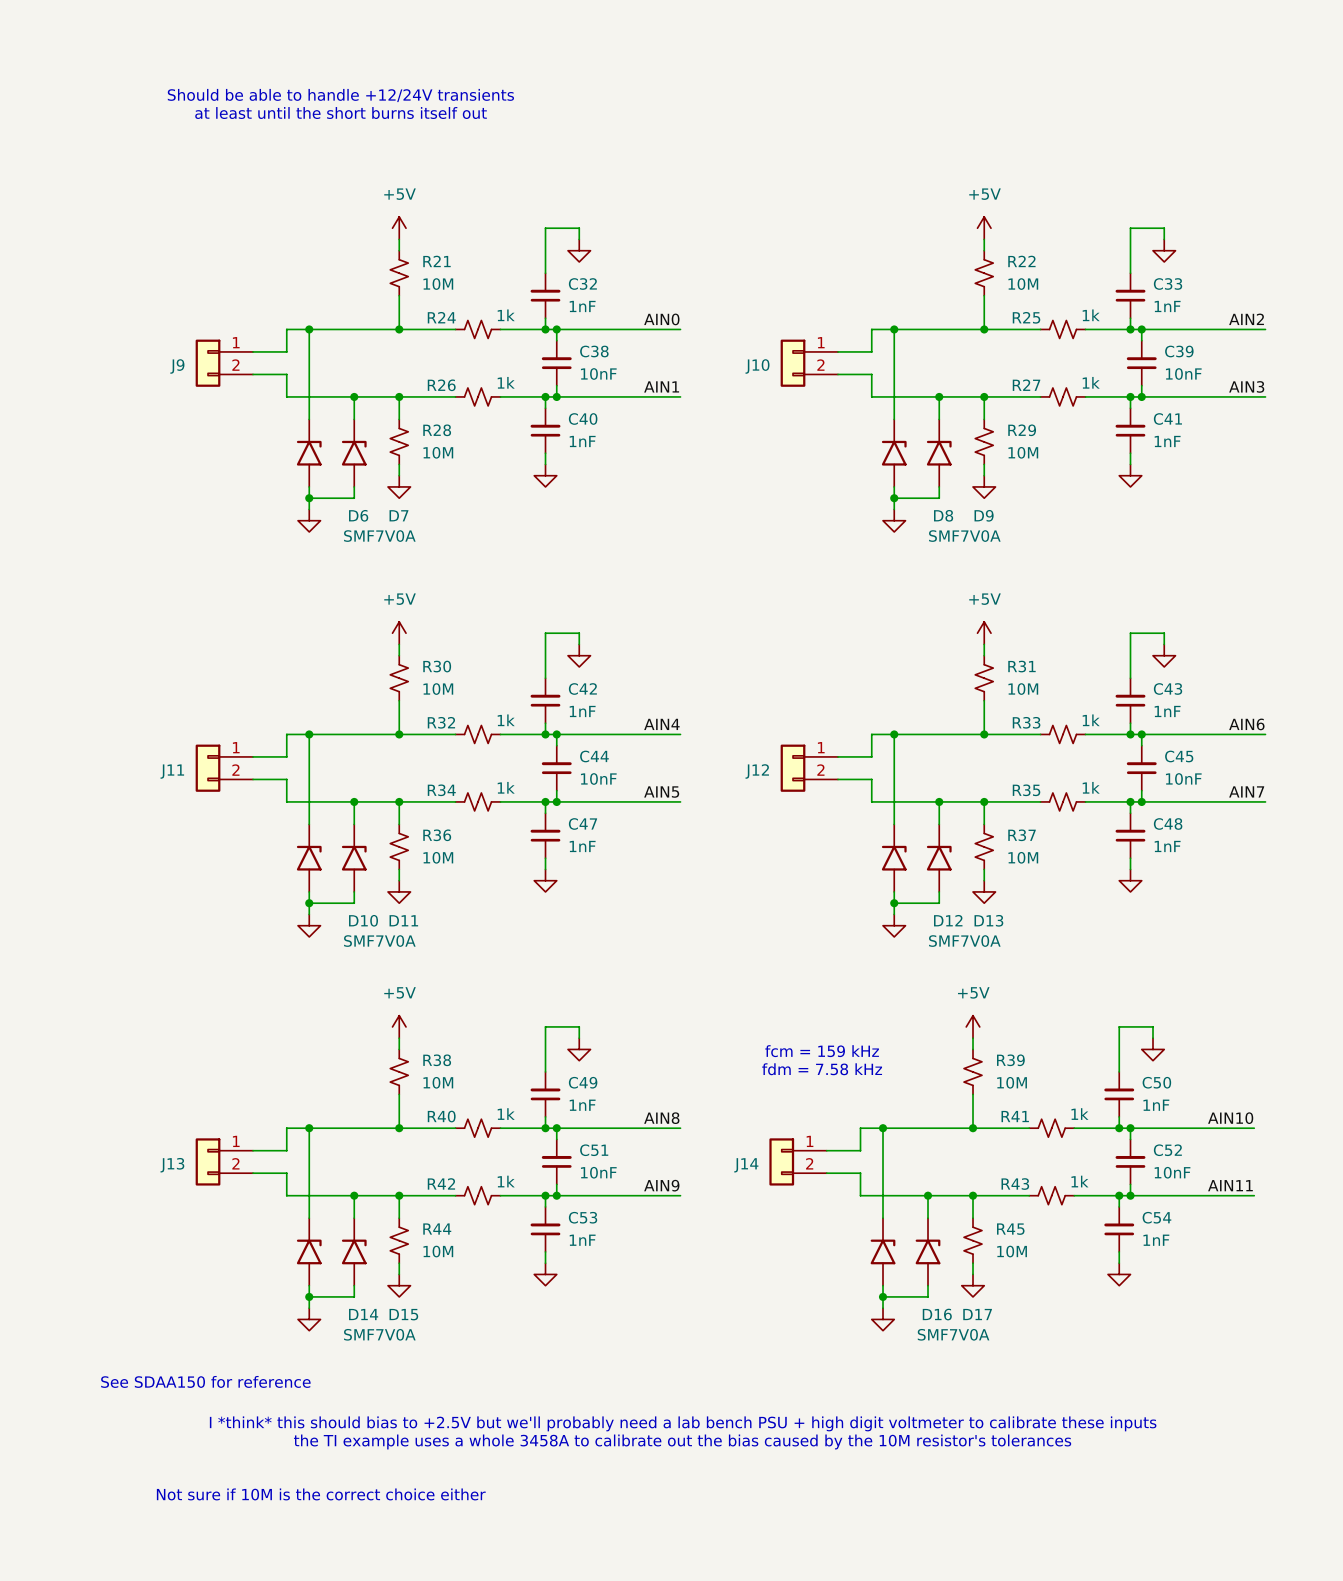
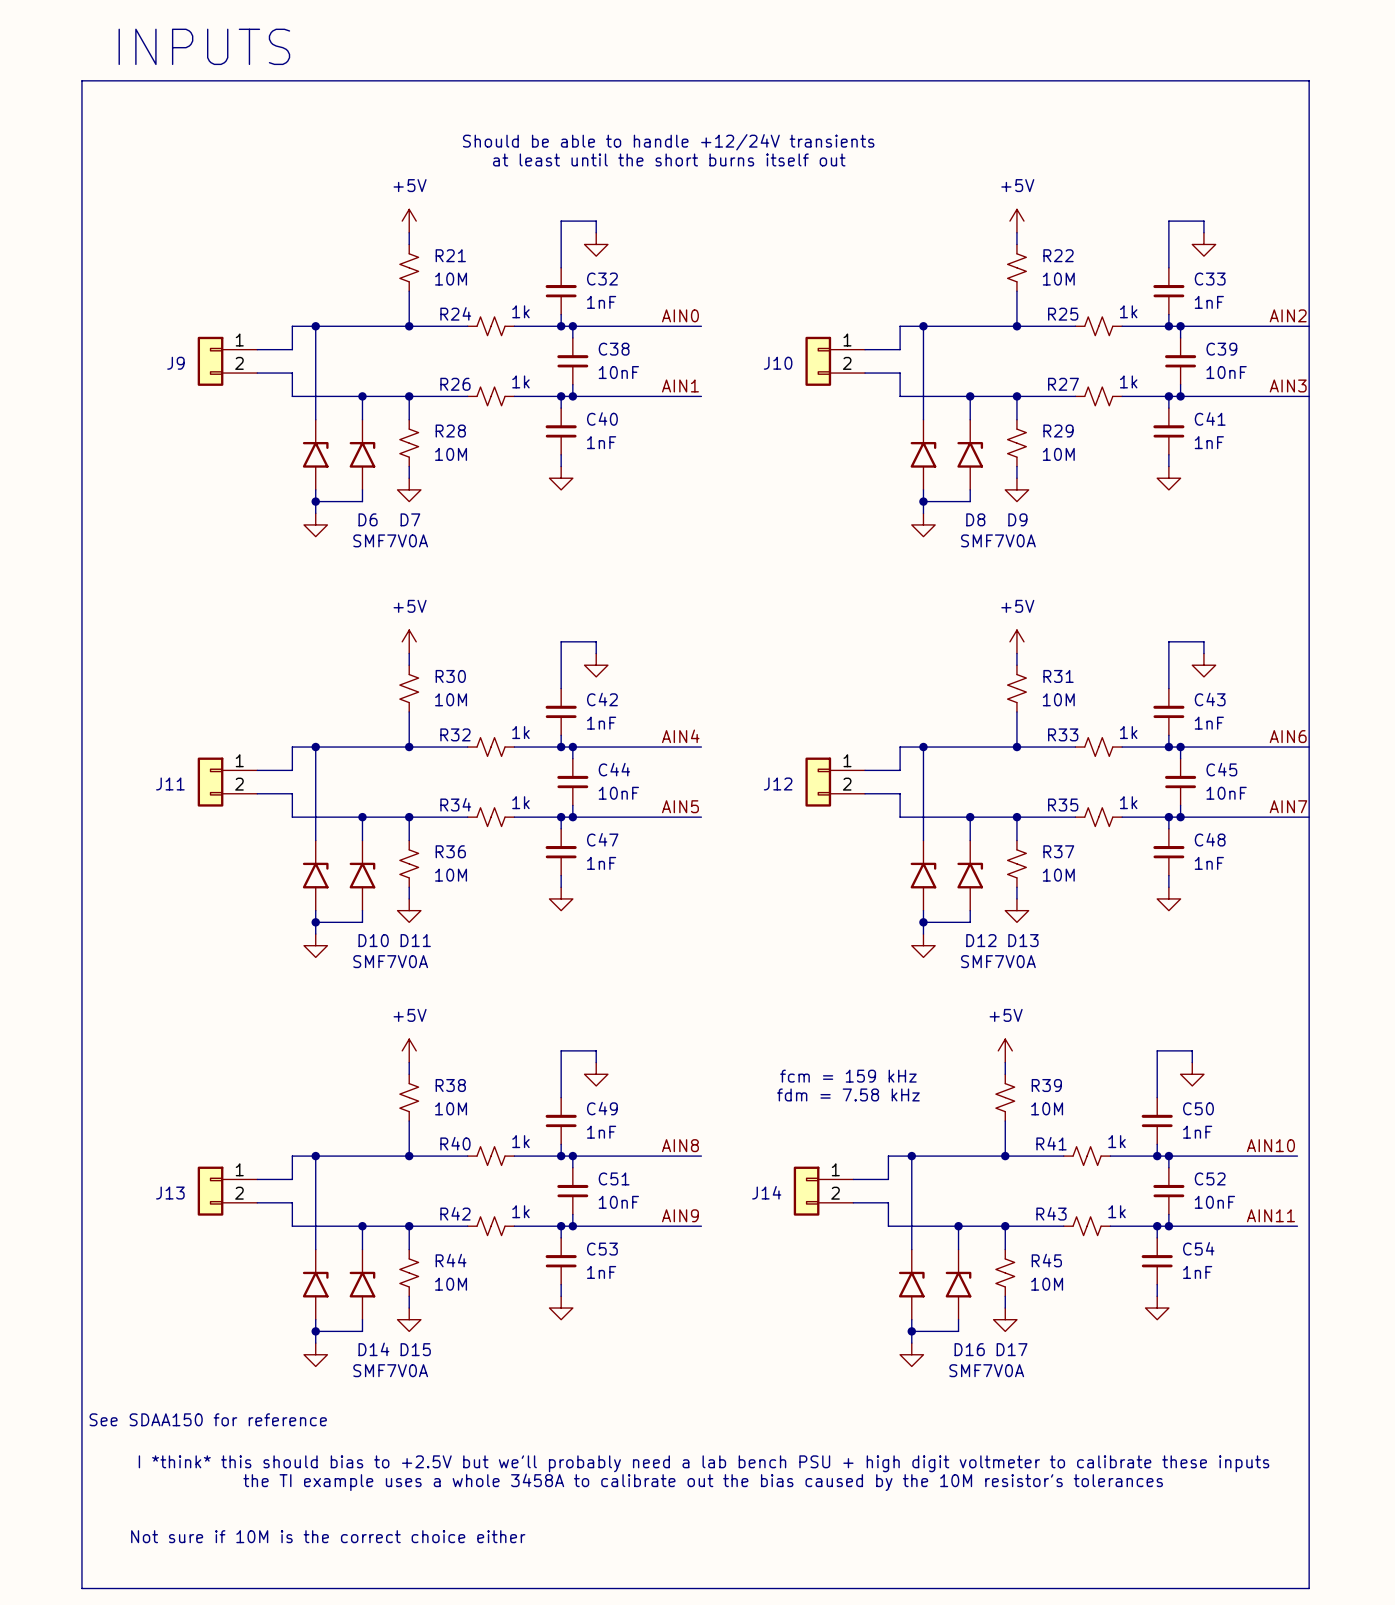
text: none -> INPUTS (204, 46)
line: none -> (81, 80) (1309, 80) (1309, 1588) (81, 1588) (81, 80)
text: Should be able to handle +12/24V transients (340, 95) -> none
text: at least until the short burns itself out (341, 113) -> none
text: none -> Should be able to handle +12/24V transients (668, 142)
text: none -> at least until the short burns itself out (669, 159)

